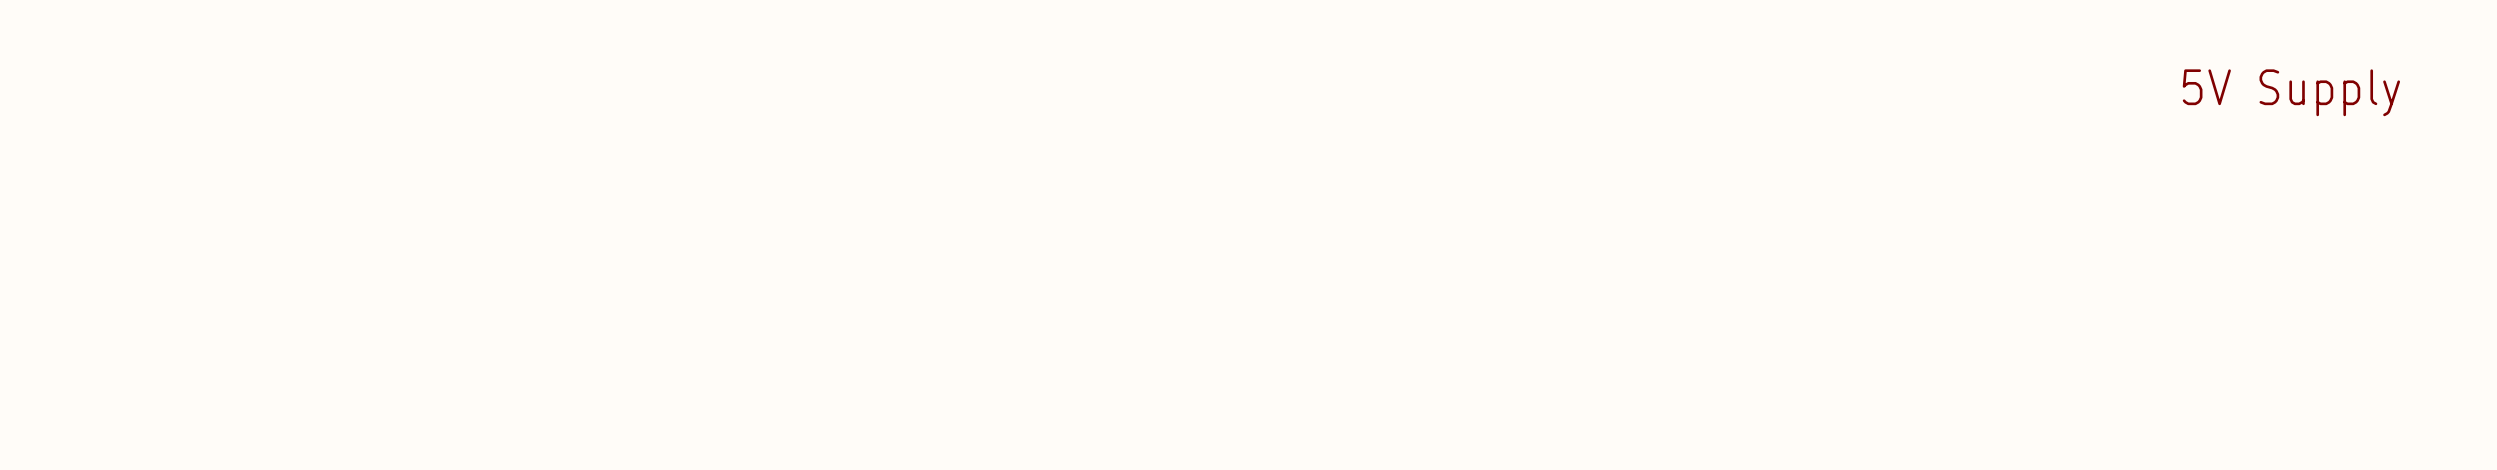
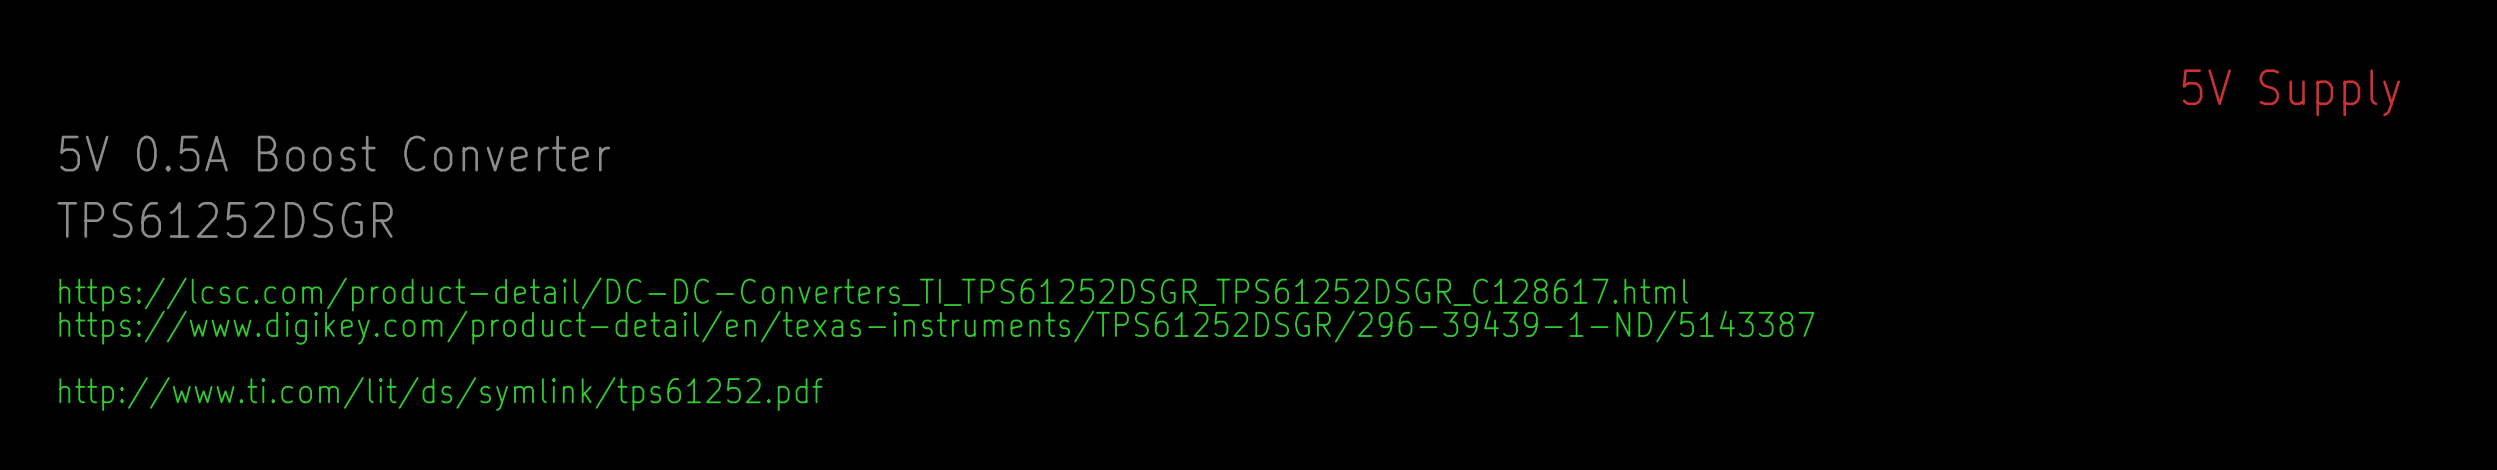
text: none -> 5V 0.5A Boost Converter (335, 153)
text: none -> TPS61252DSGR (225, 219)
text: none -> https://lcsc.com/product-detail/DC-DC-Converters_TI_TPS61252DSGR_TPS61252DSGR_C128617.html (873, 294)
text: none -> https://www.digikey.com/product-detail/en/texas-instruments/TPS61252DSGR/296-39439-1-ND/5143387 (936, 327)
text: none -> http://www.ti.com/lit/ds/symlink/tps61252.pdf (440, 394)

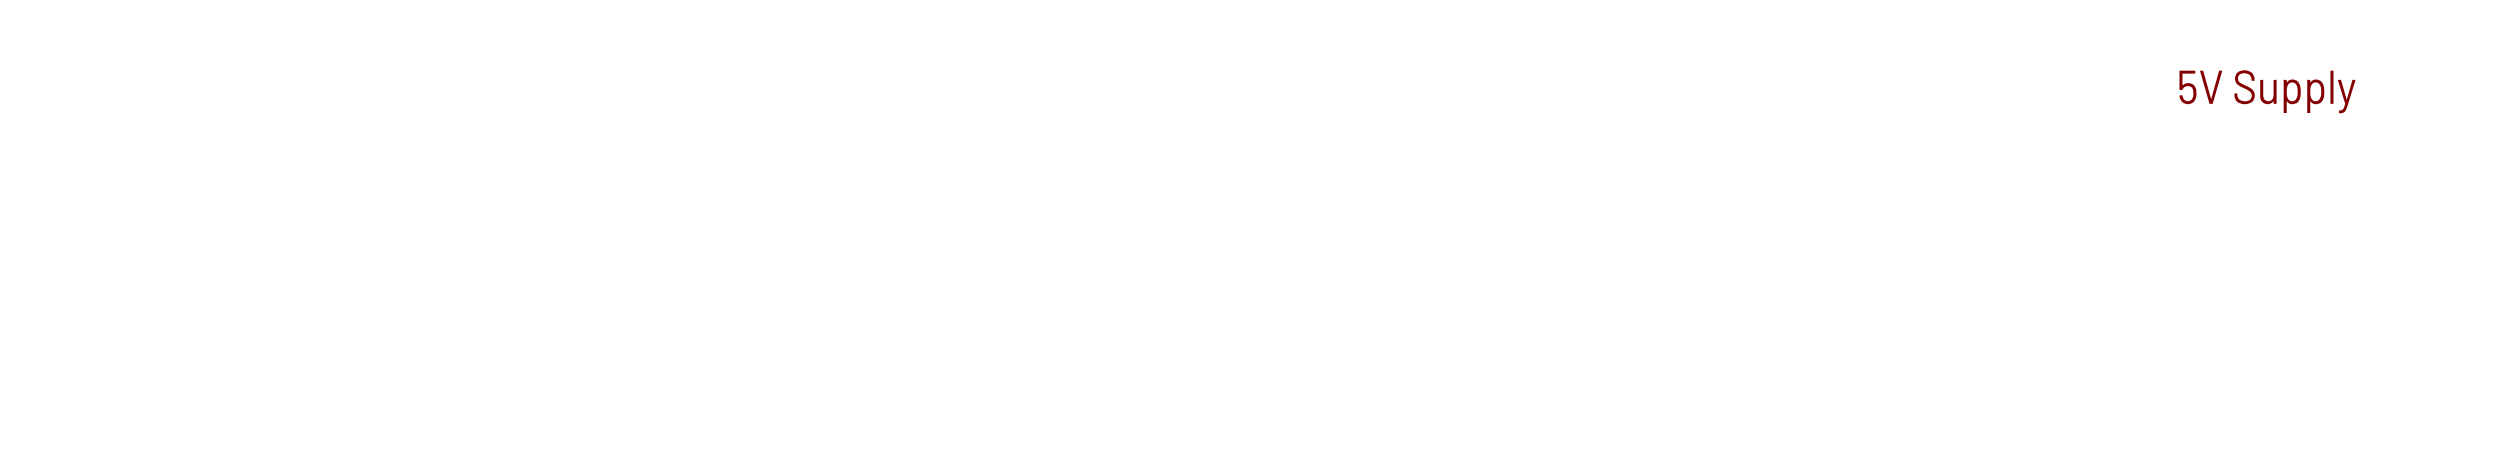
text: 5V 0.5A Boost Converter (335, 153) -> none
text: TPS61252DSGR (225, 219) -> none
text: https://lcsc.com/product-detail/DC-DC-Converters_TI_TPS61252DSGR_TPS61252DSGR_C128617.html (873, 294) -> none
text: https://www.digikey.com/product-detail/en/texas-instruments/TPS61252DSGR/296-39439-1-ND/5143387 (936, 327) -> none
text: http://www.ti.com/lit/ds/symlink/tps61252.pdf (440, 394) -> none

